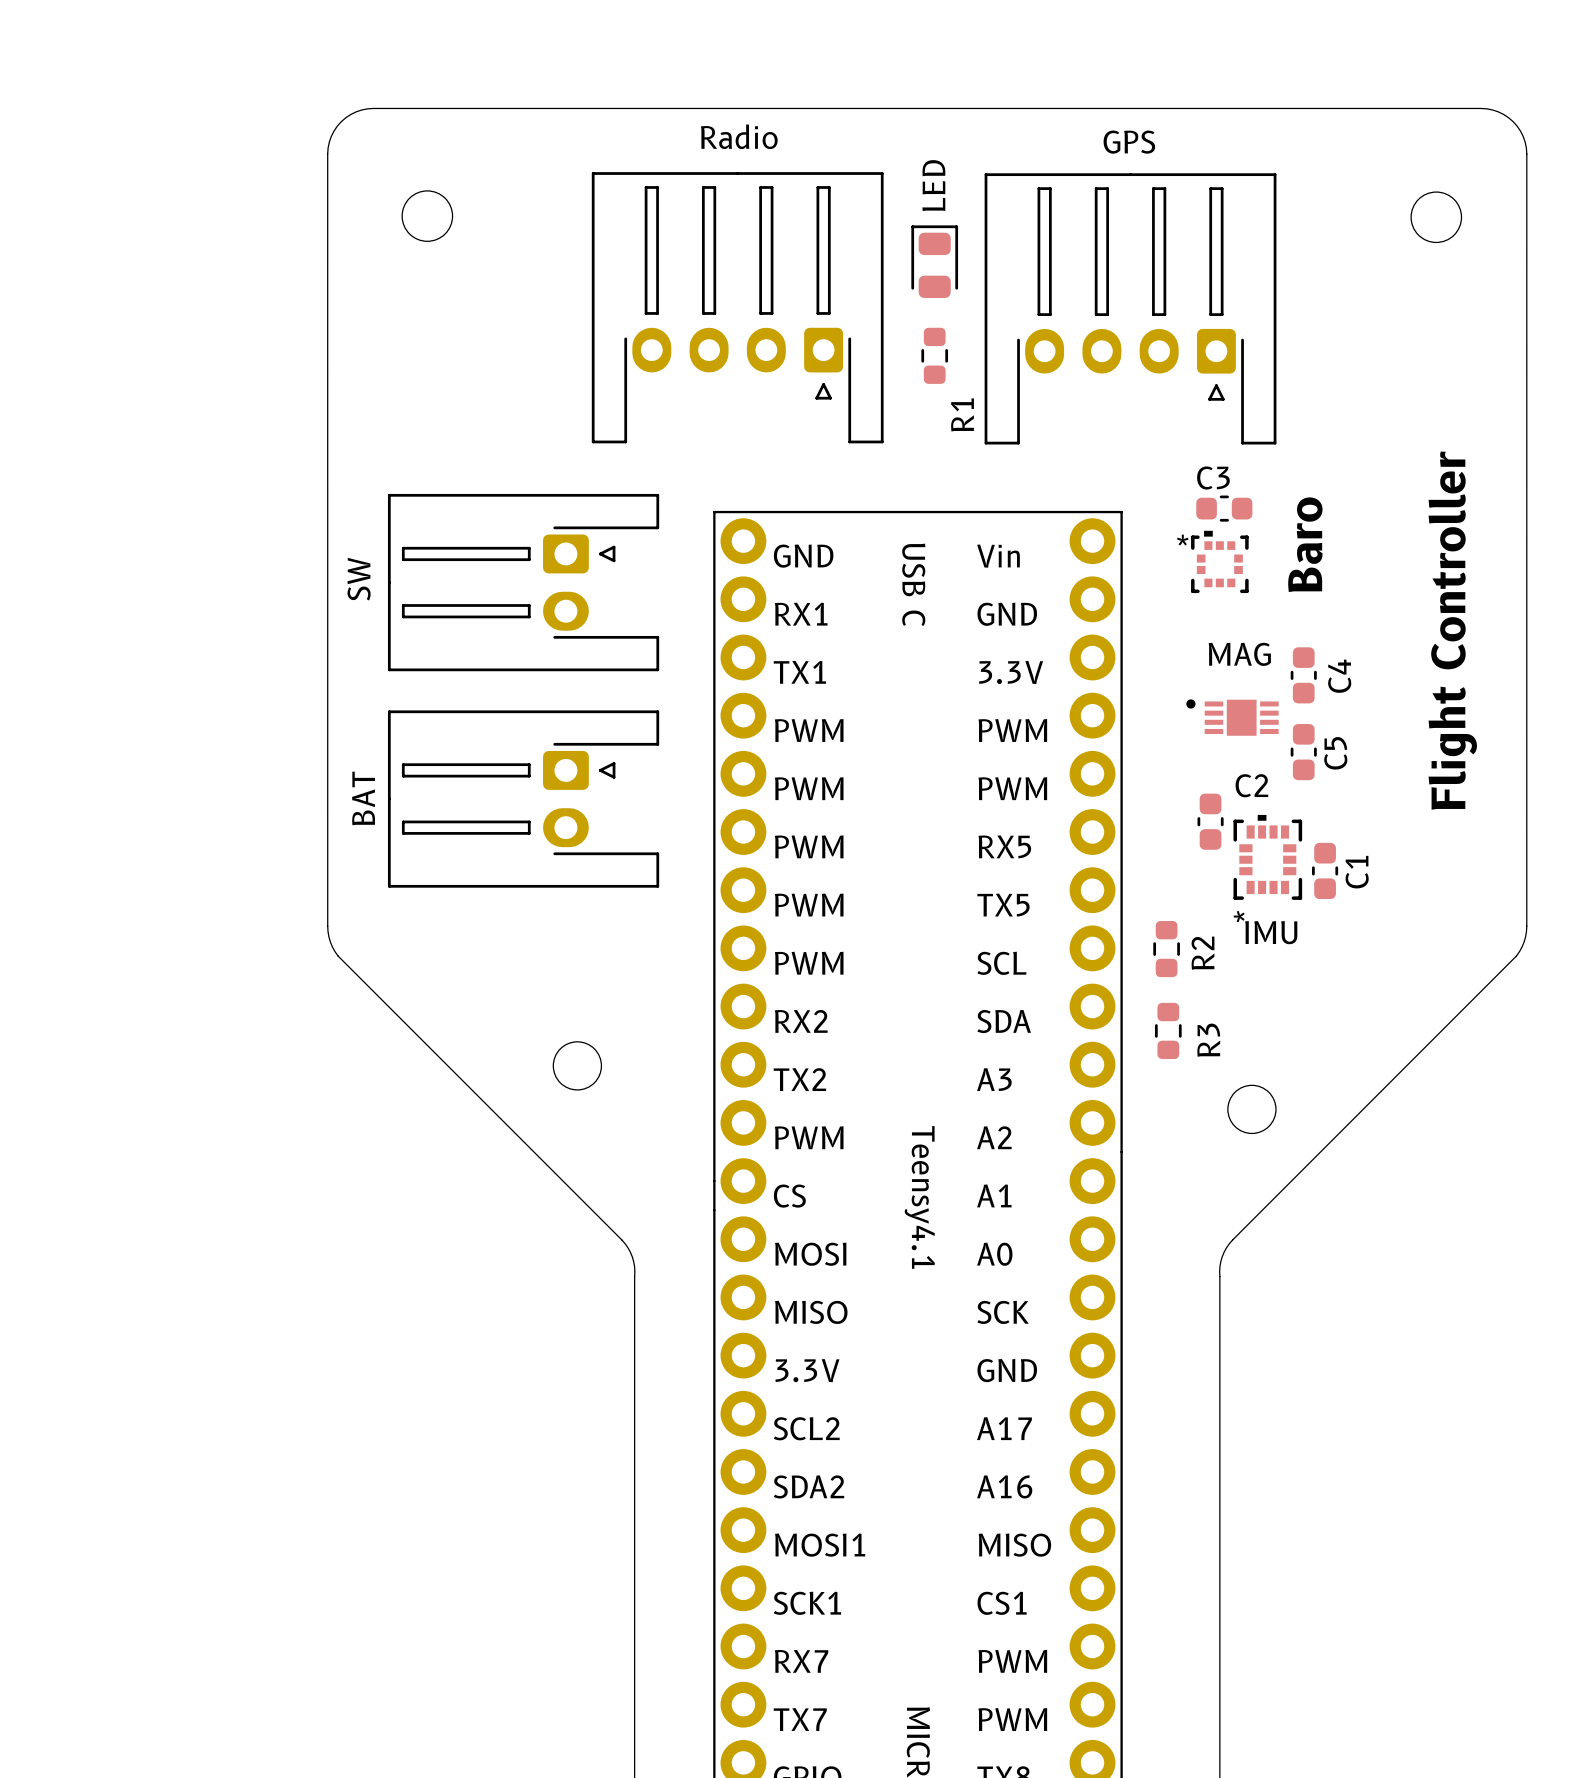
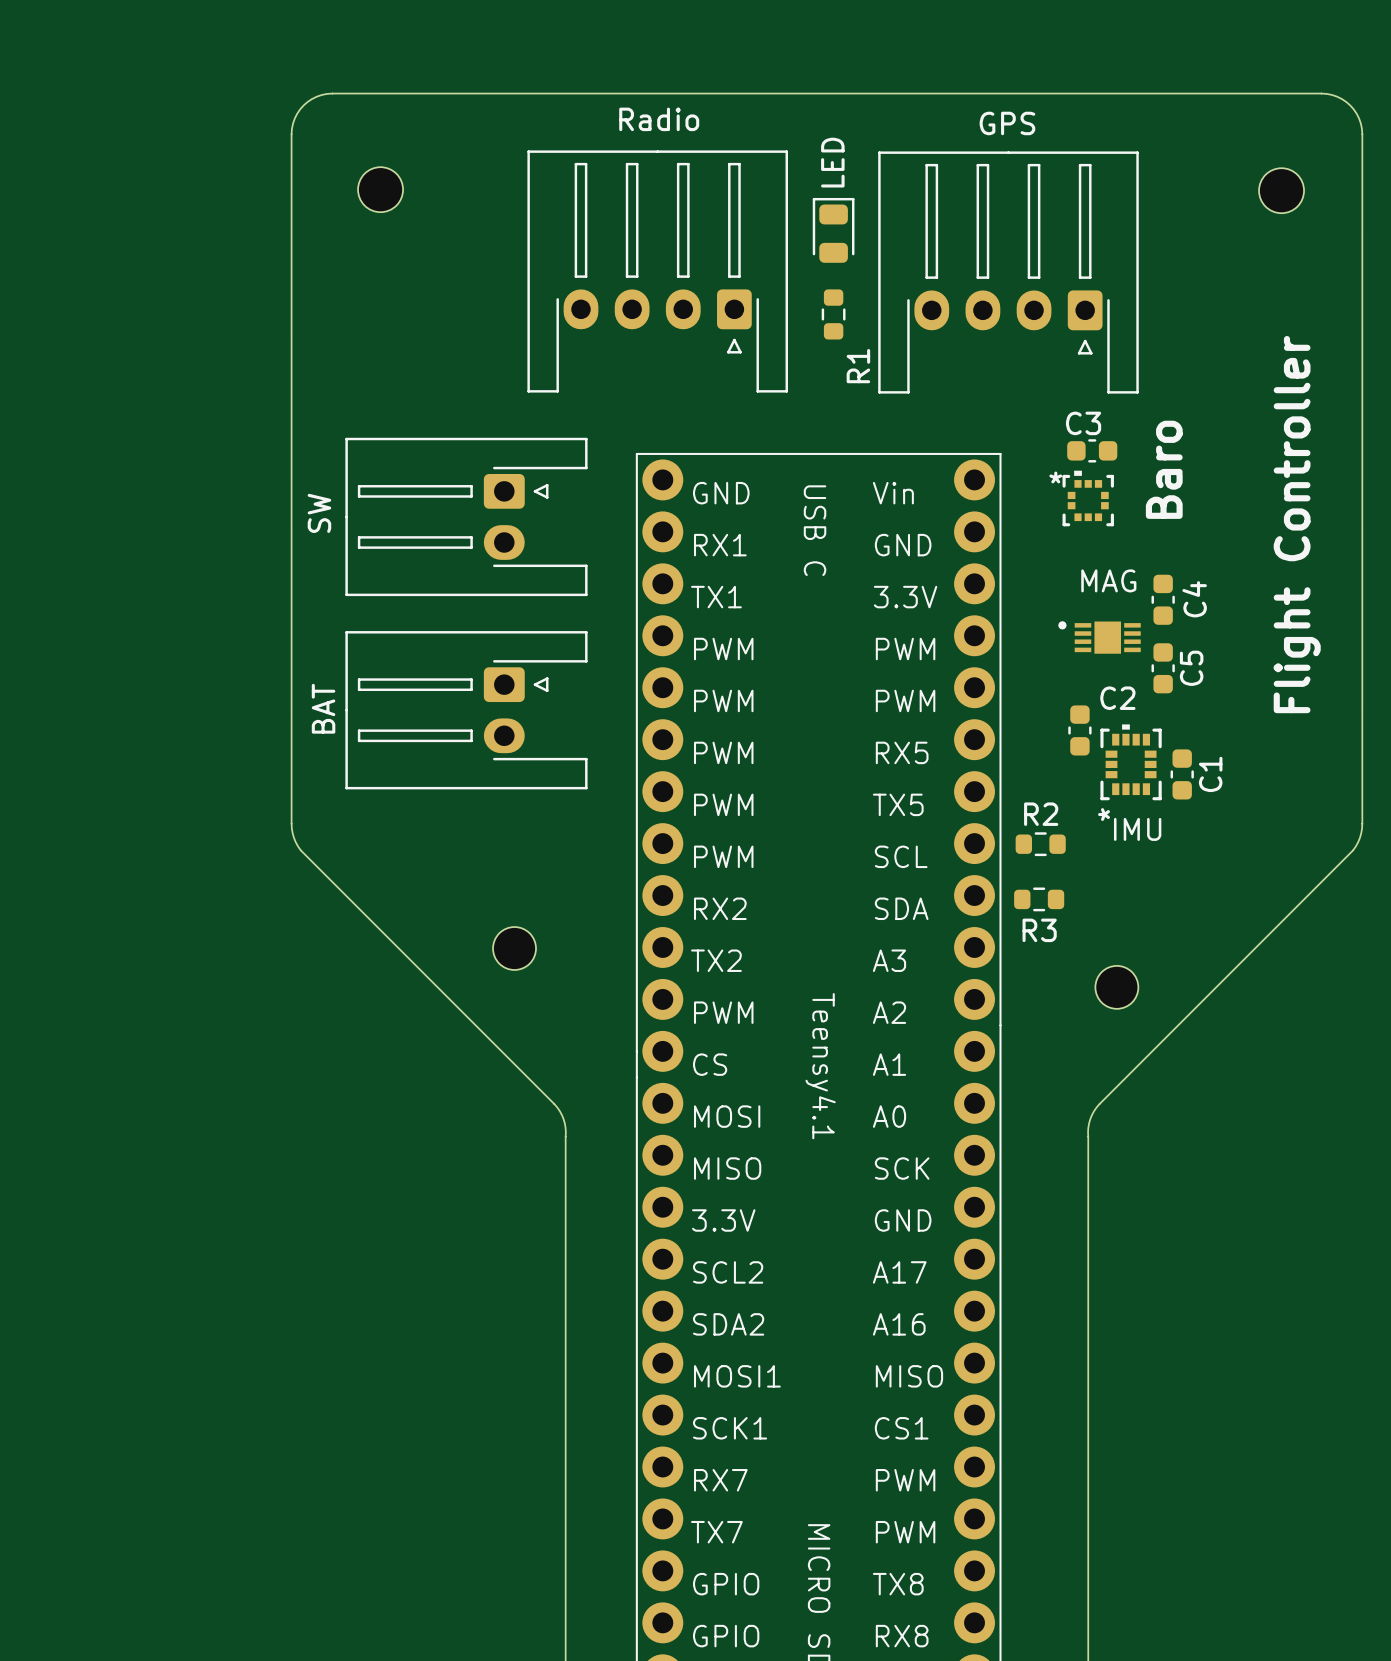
R2 rotation: 0° (1166, 949) -> 90° clockwise (1040, 844)
R2 name position: R2 (1202, 953) -> R2 (1041, 814)
R3 rotation: 0° (1168, 1030) -> 90° clockwise (1039, 899)

